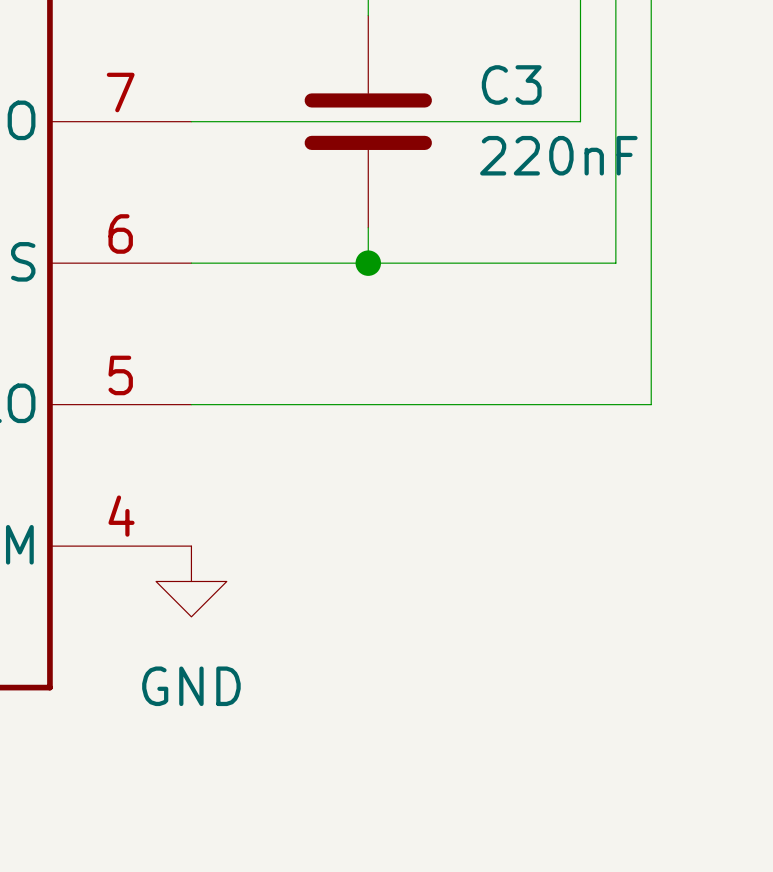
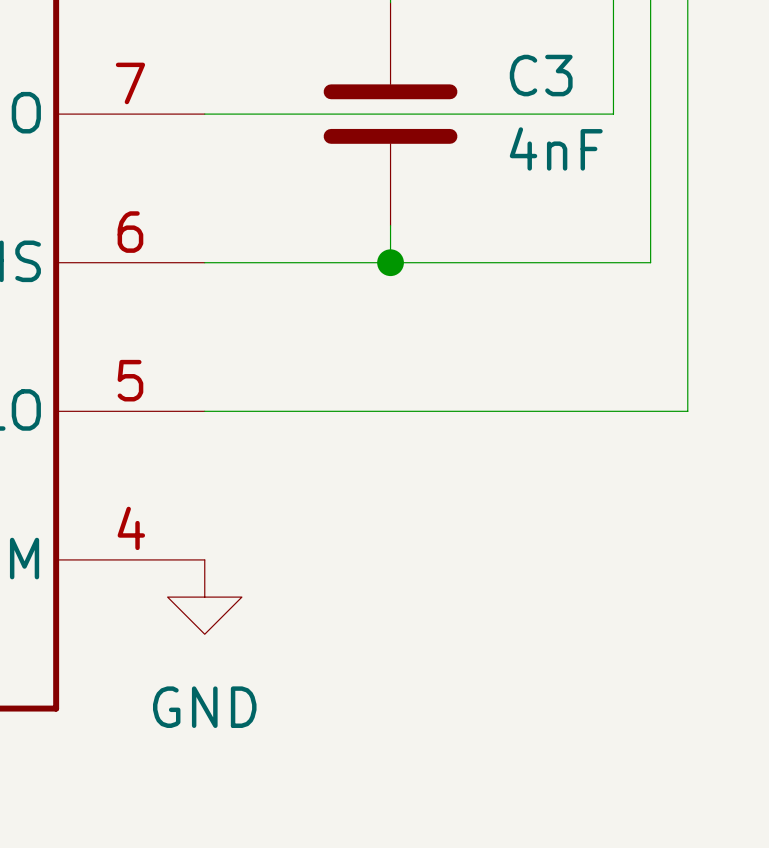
C3 value: 220nF (558, 155) -> 4nF (556, 148)

